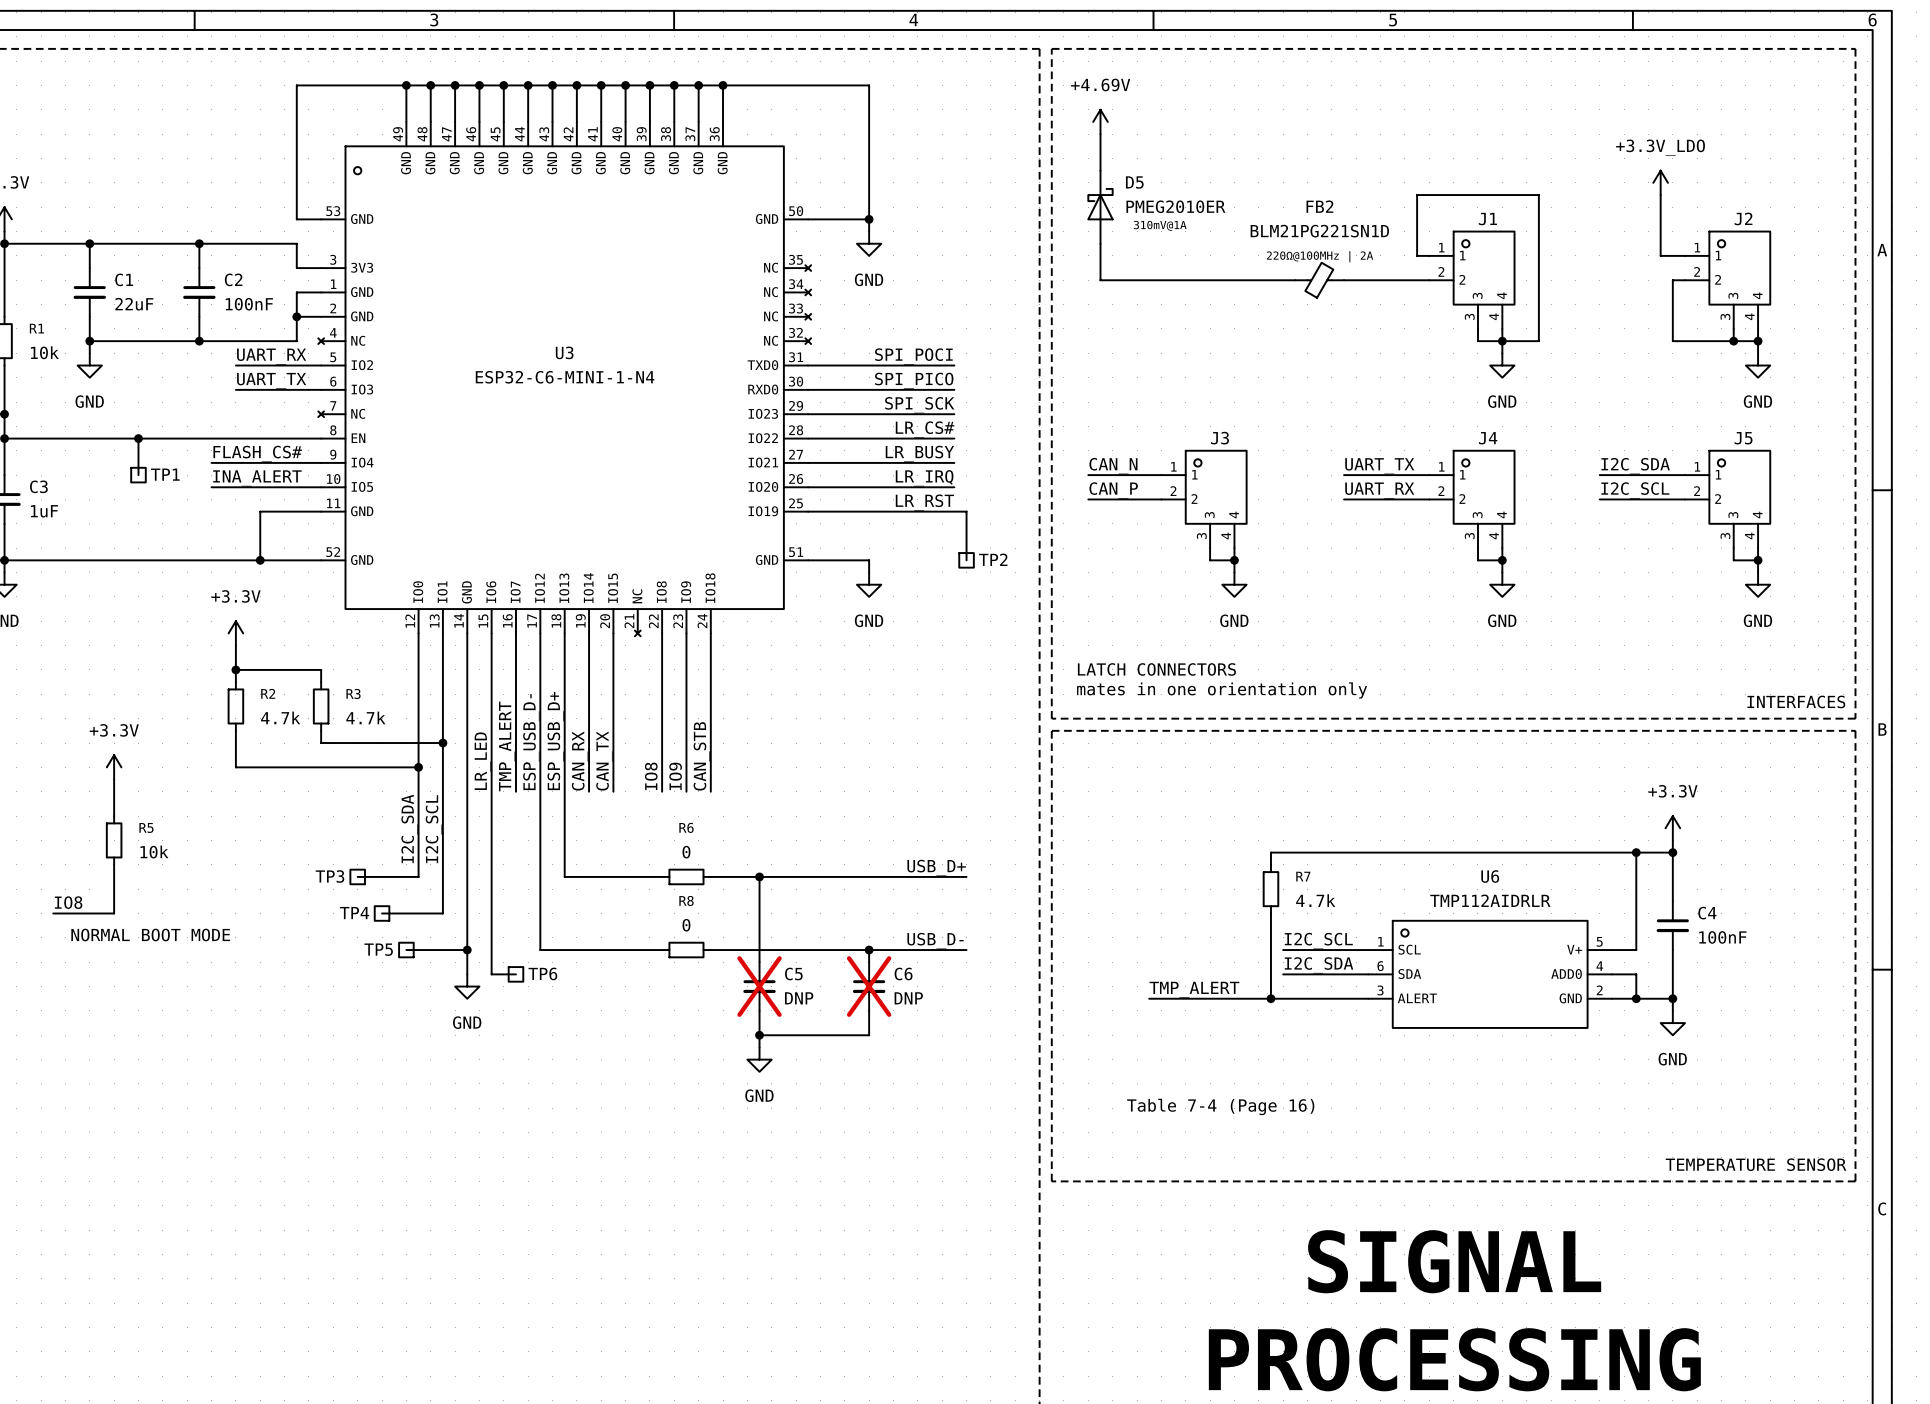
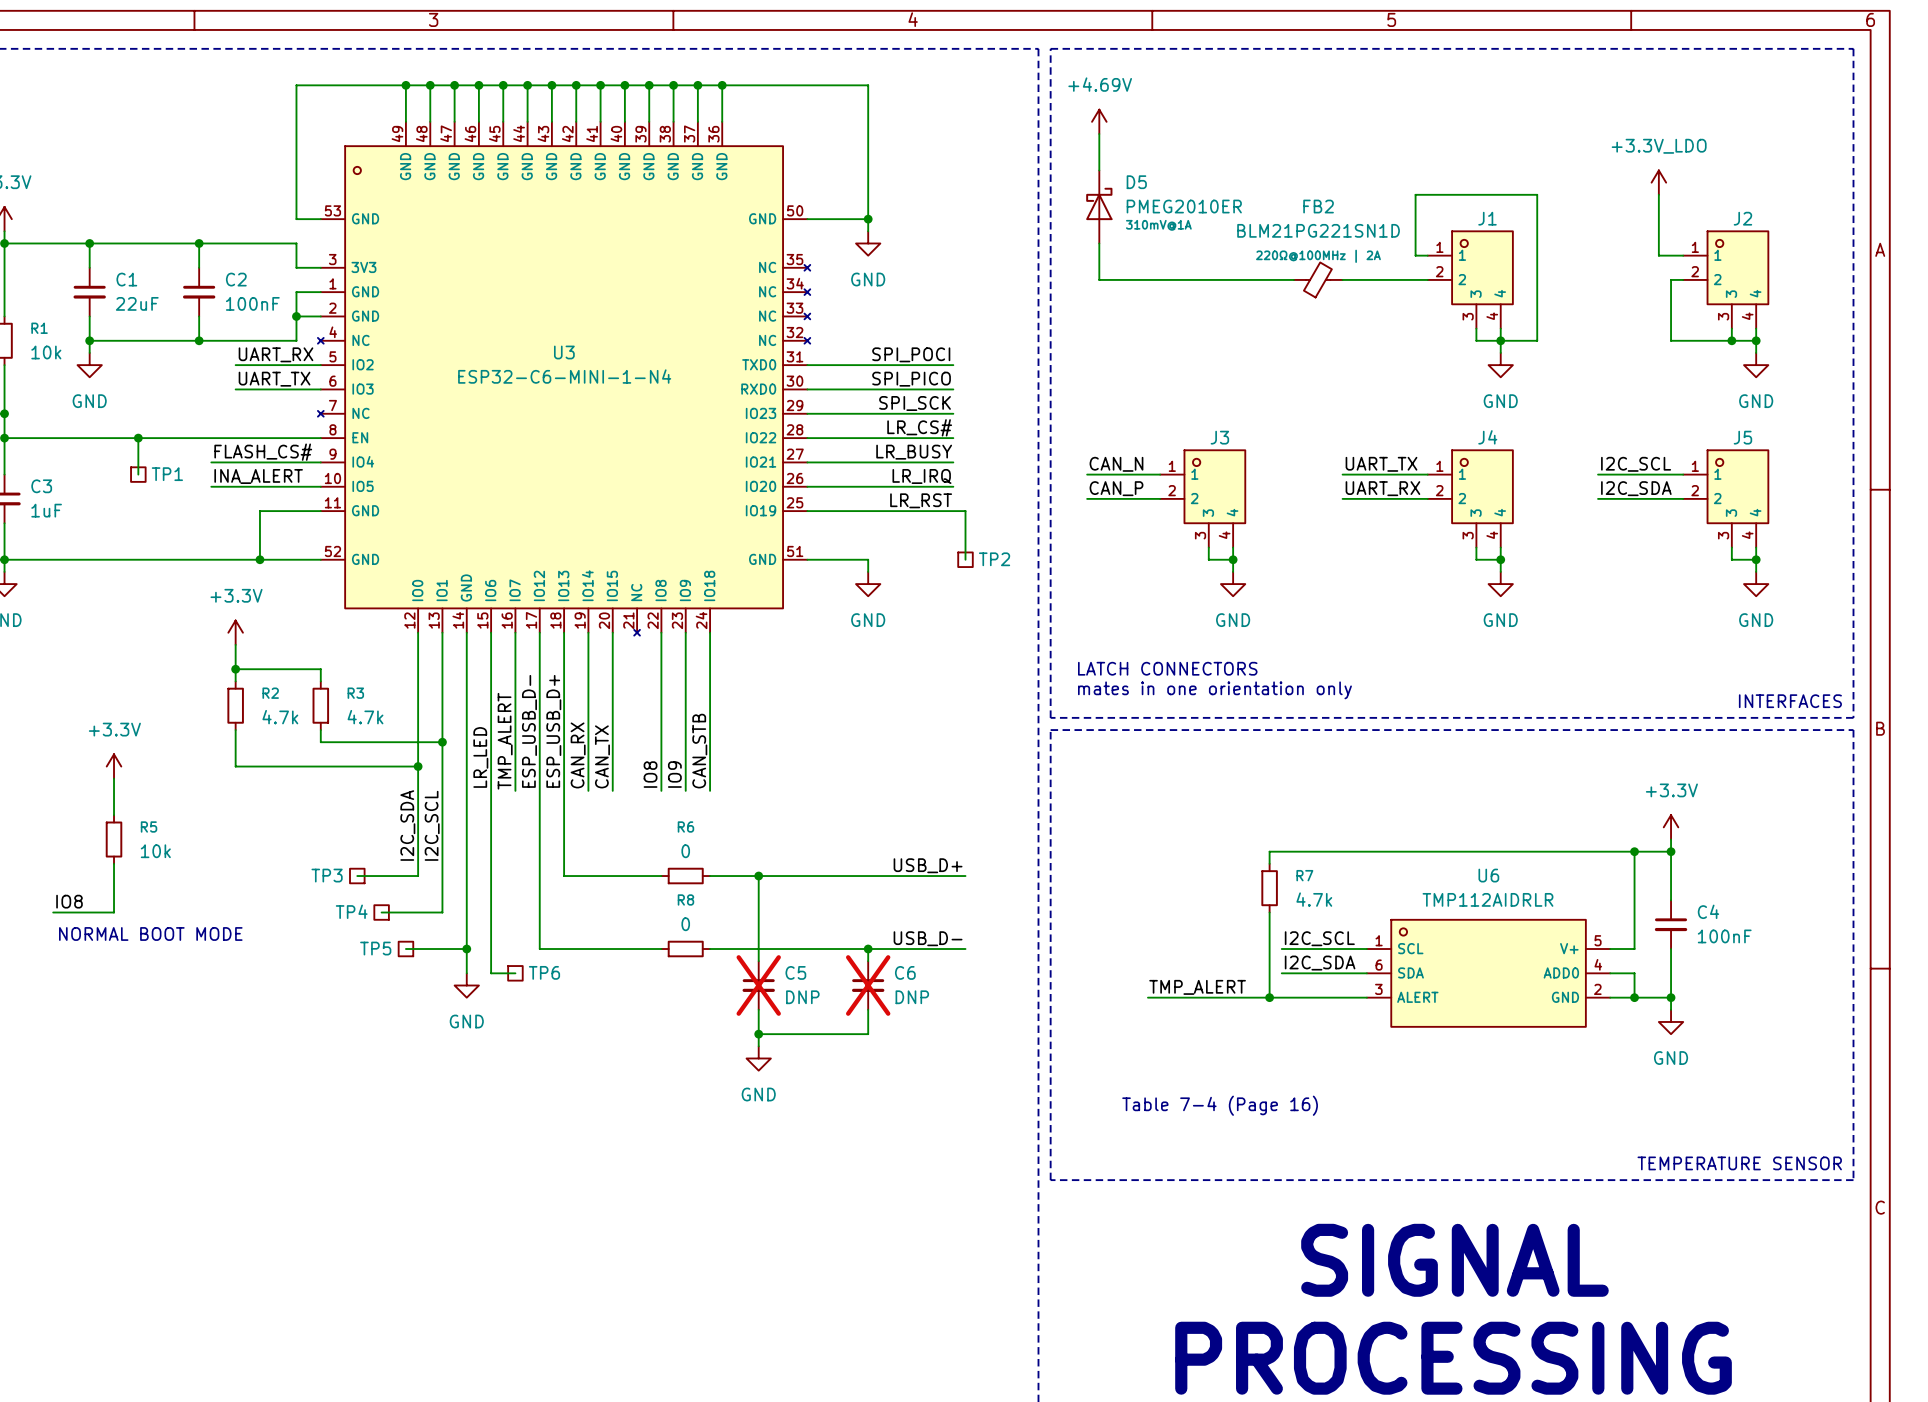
label: I2C_SDA (1635, 466) -> I2C_SCL (1636, 464)
label: I2C_SCL (1635, 490) -> I2C_SDA (1636, 488)

